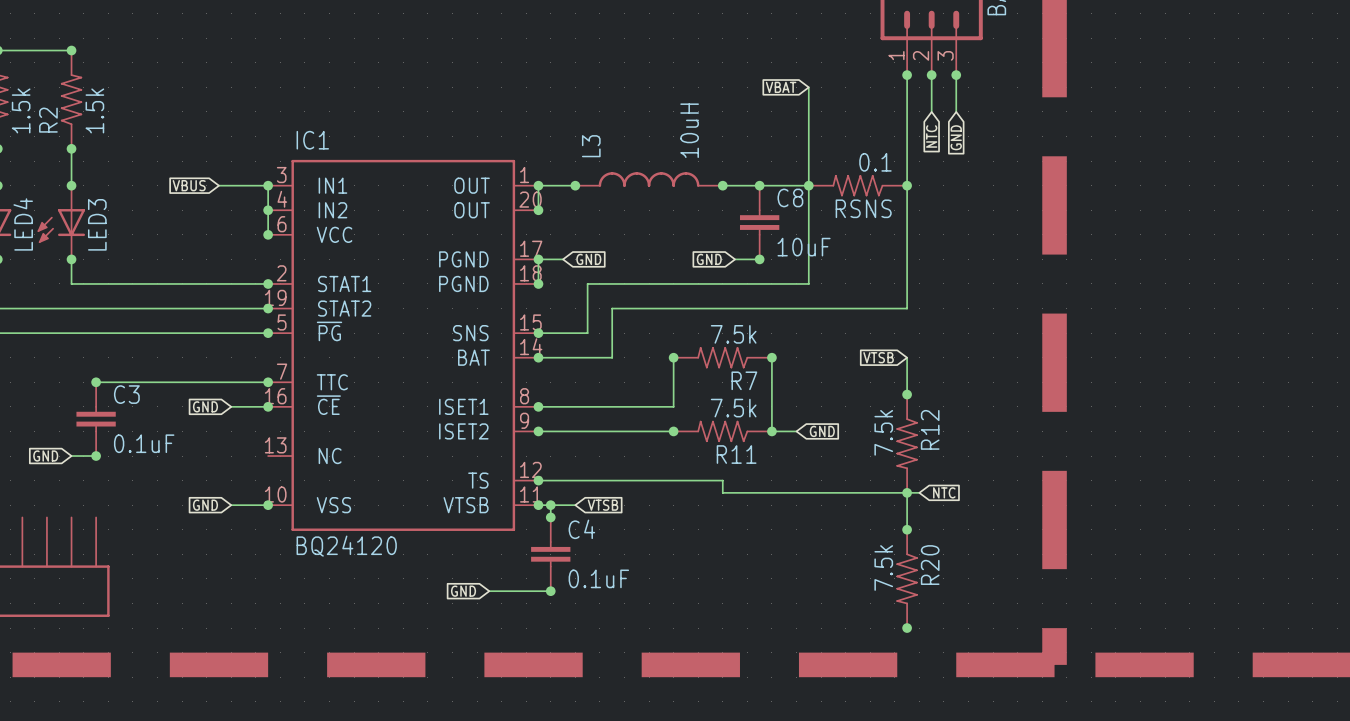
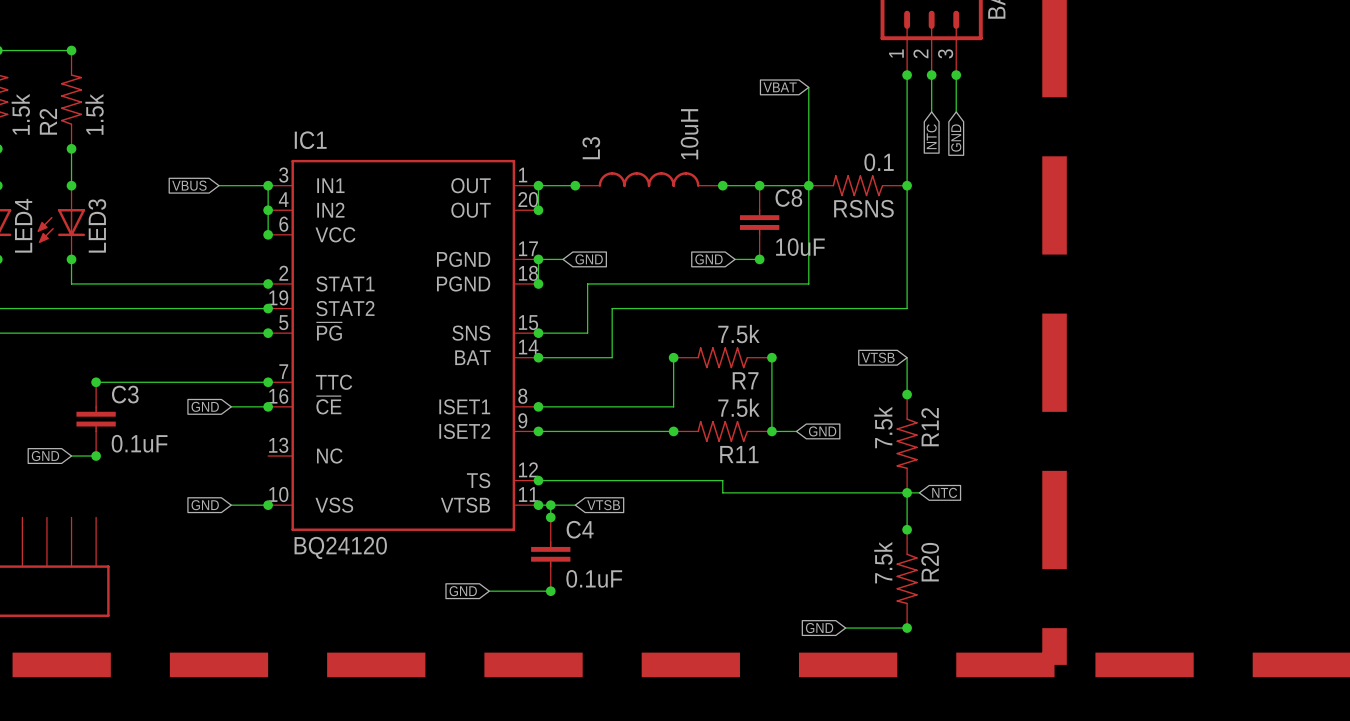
global label: none -> GND (819, 628)
wire: none -> (845, 628) (907, 628)

